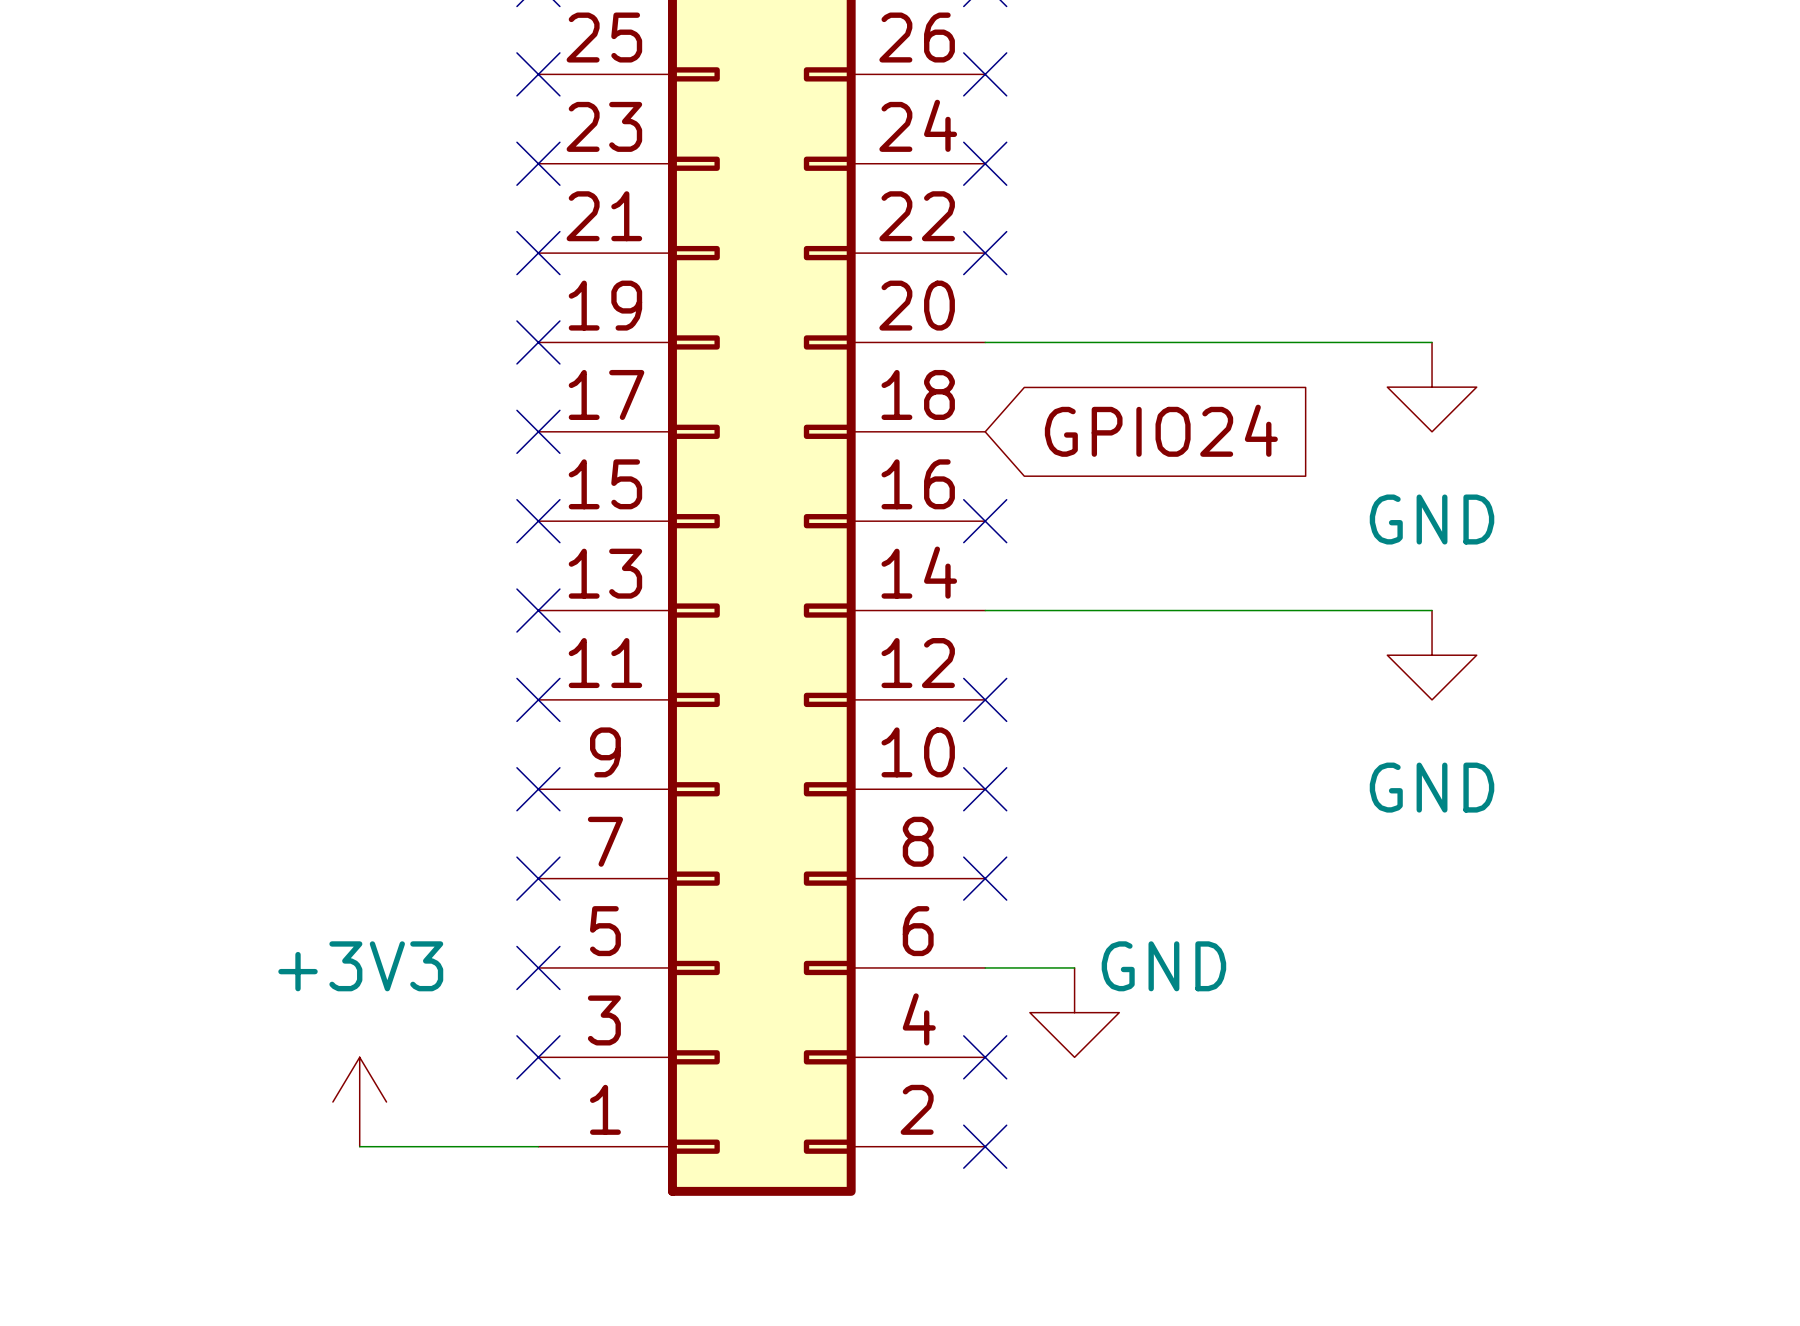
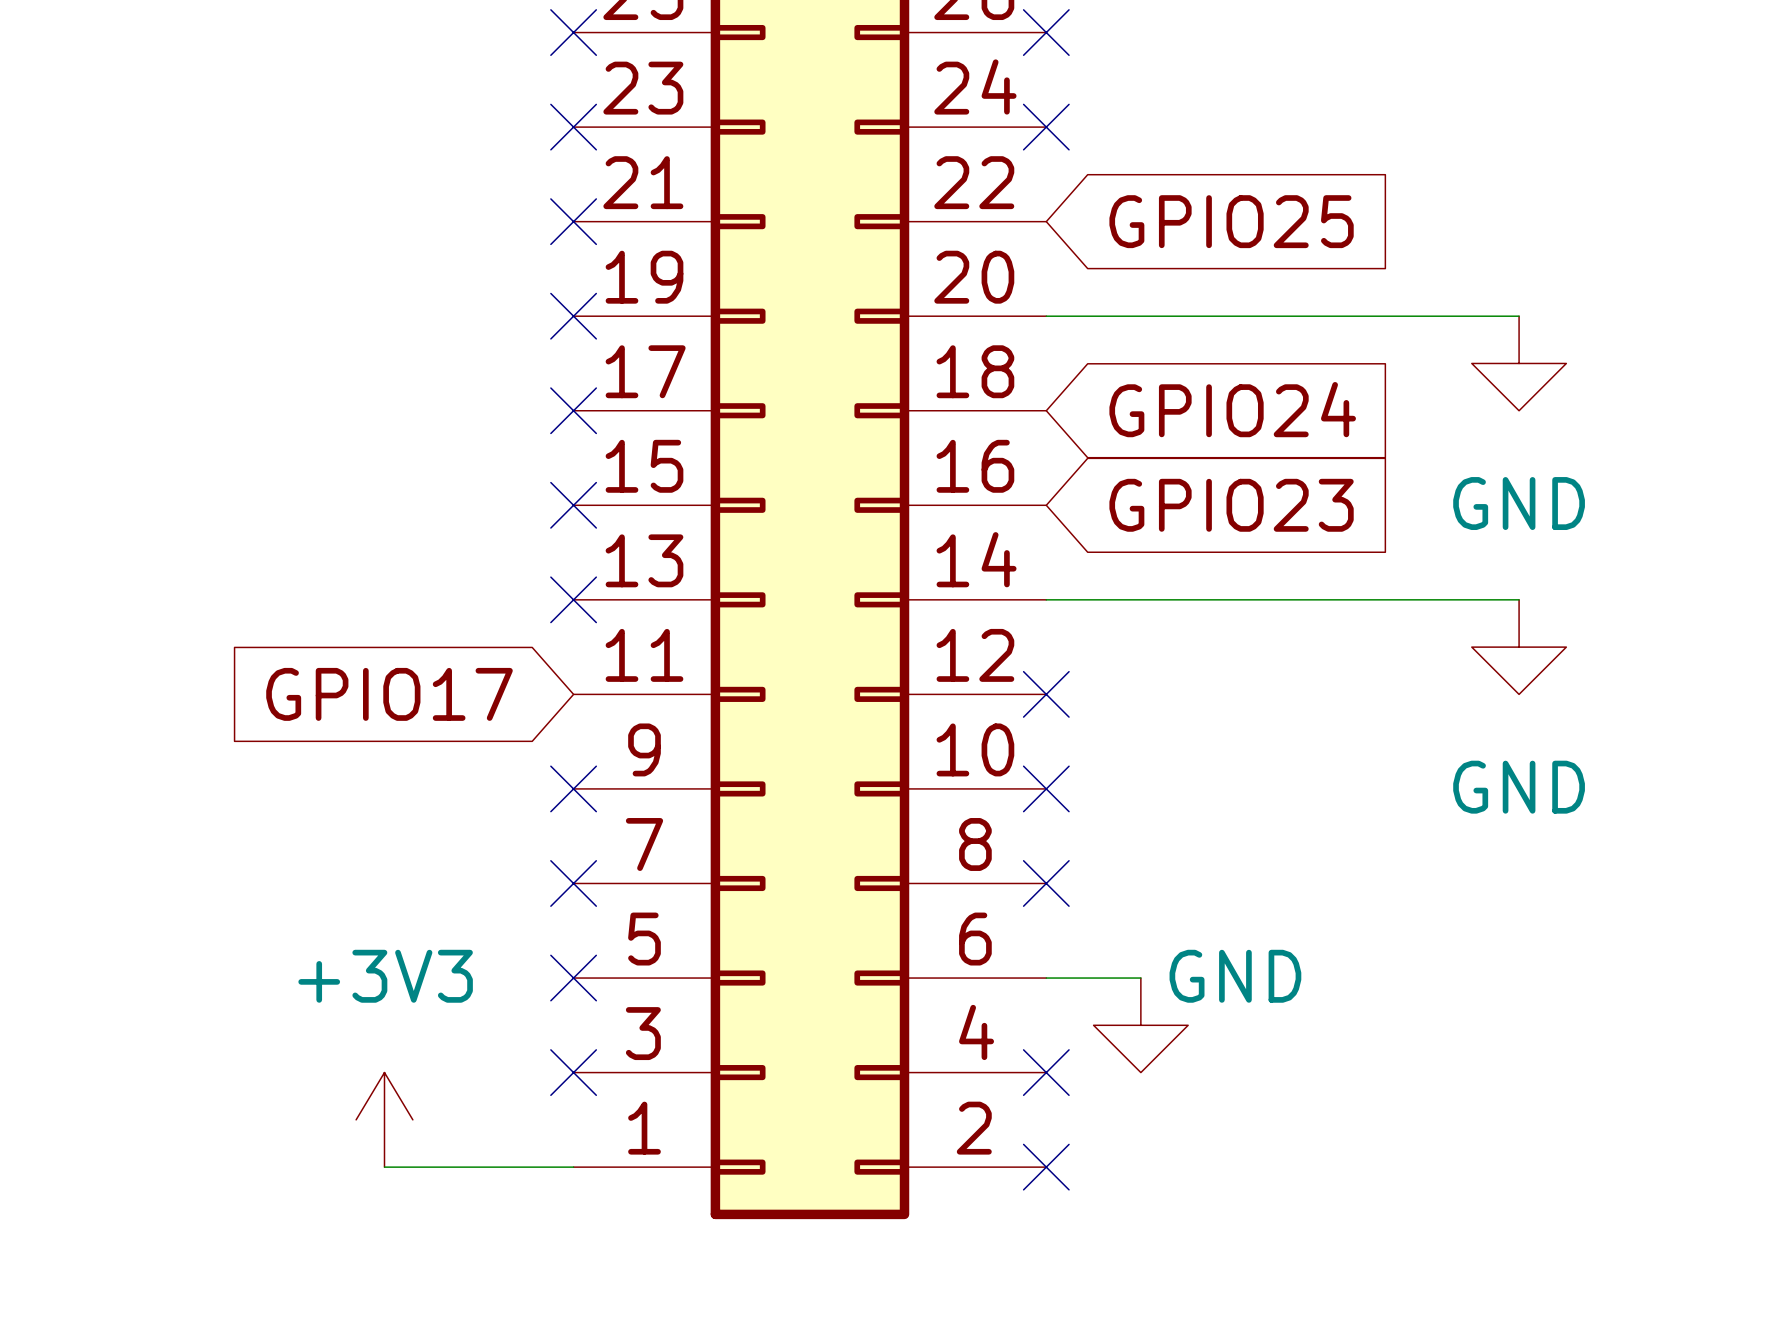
no-connect mark: (985, 253) -> none
global label: none -> GPIO25 (1231, 221)
no-connect mark: (985, 521) -> none
global label: none -> GPIO23 (1231, 505)
global label: none -> GPIO17 (389, 694)
no-connect mark: (538, 699) -> none

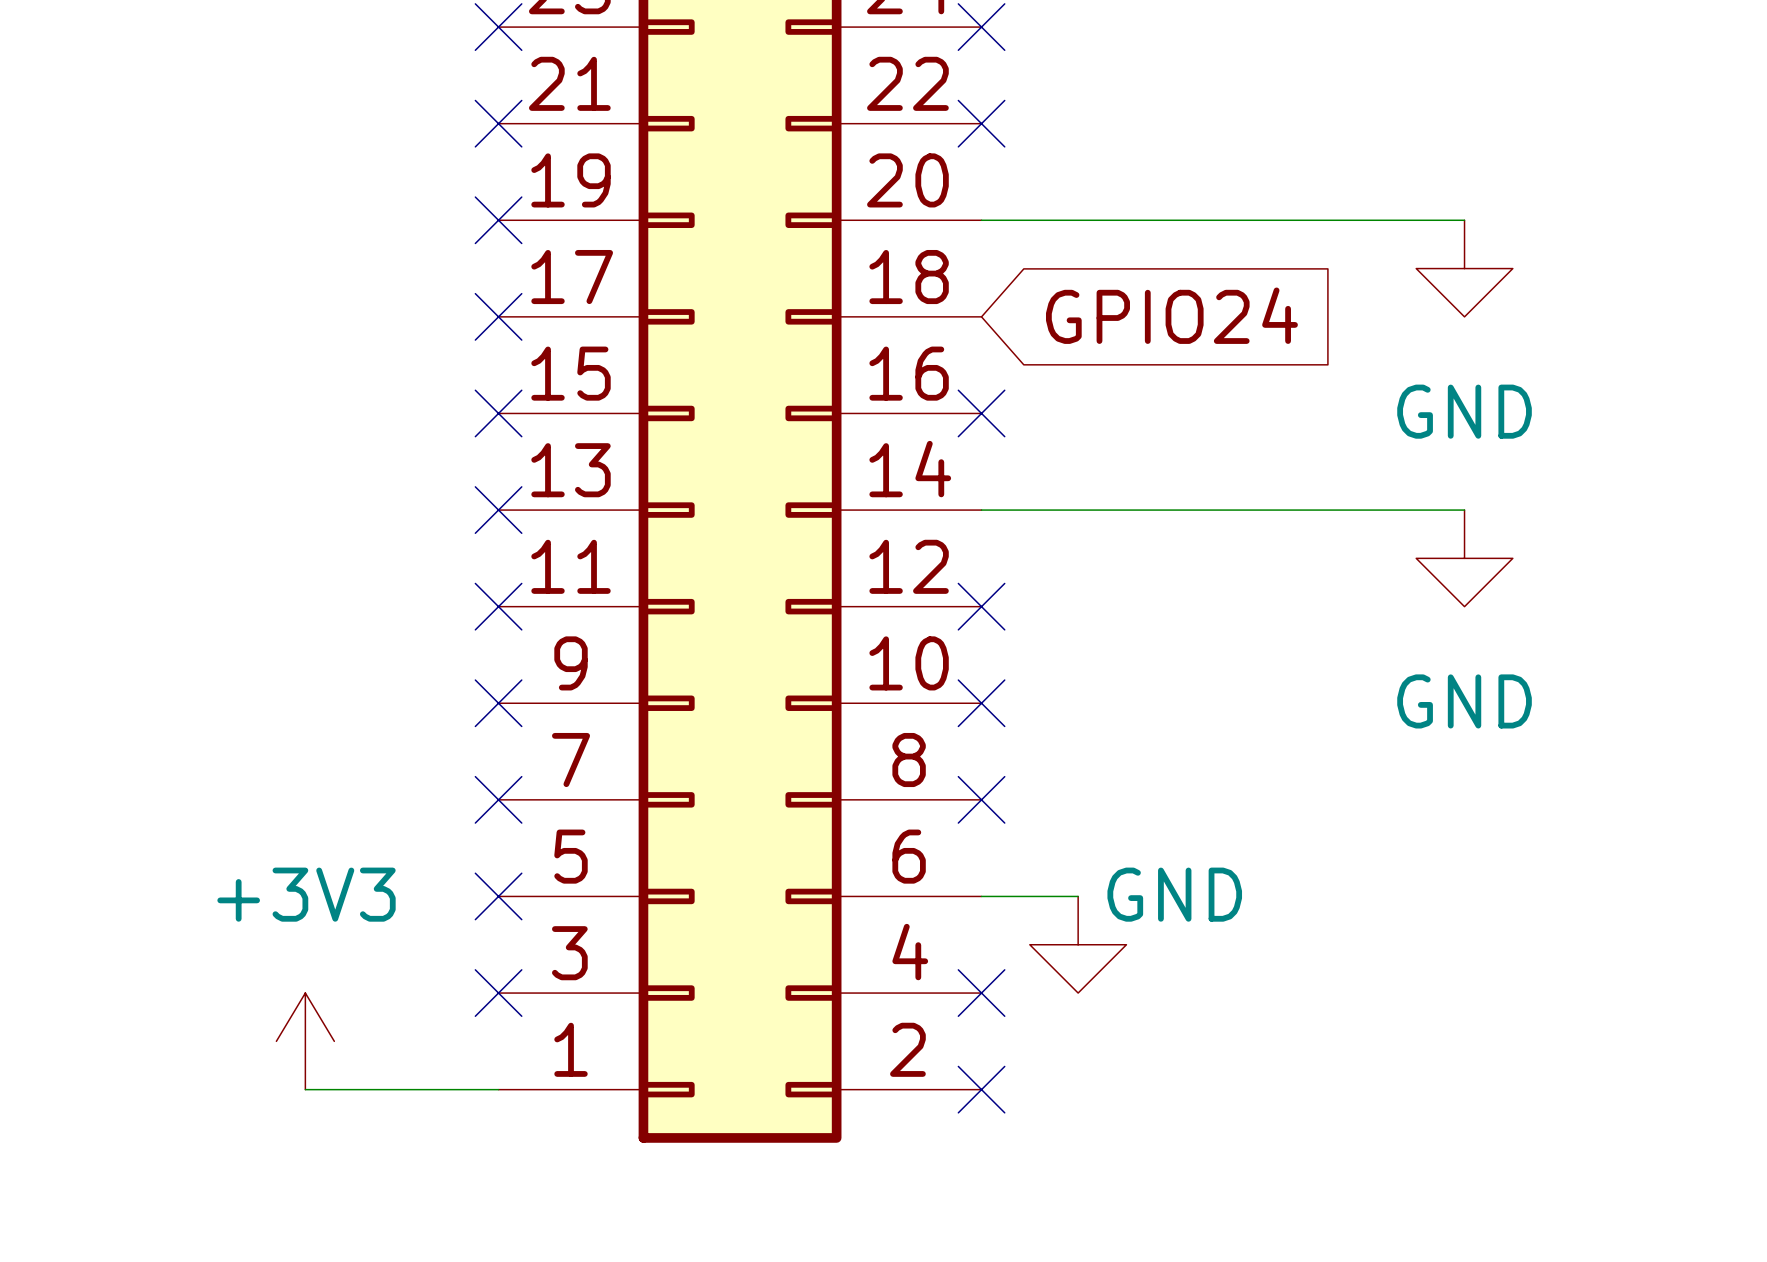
no-connect mark: none -> (981, 123)
global label: GPIO25 (1231, 221) -> none
no-connect mark: none -> (981, 413)
global label: GPIO23 (1231, 505) -> none
global label: GPIO17 (389, 694) -> none
no-connect mark: none -> (498, 606)

